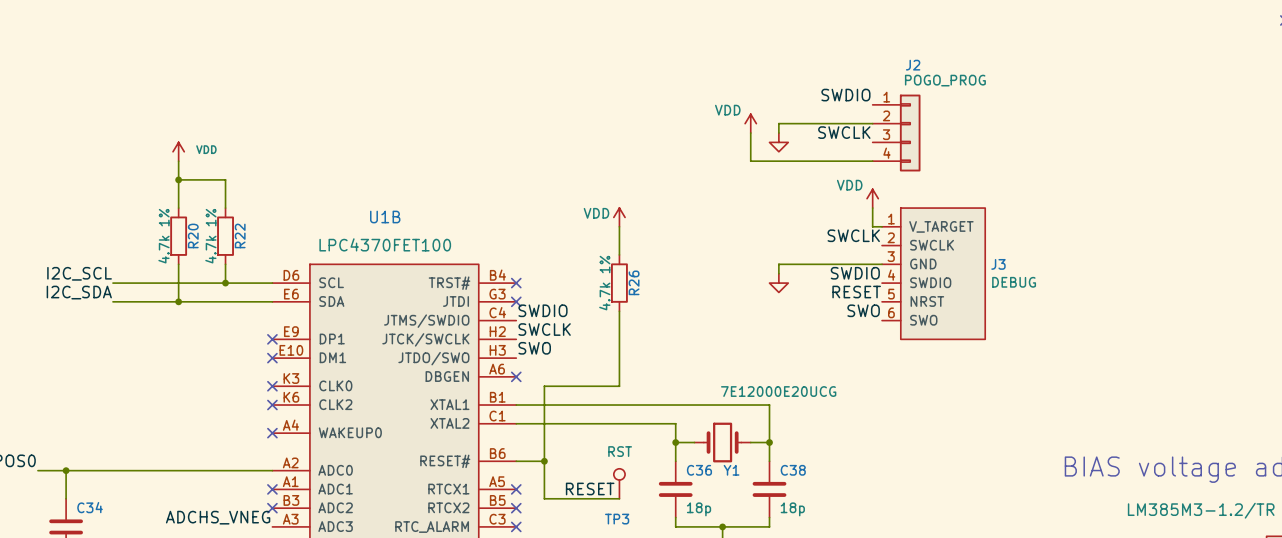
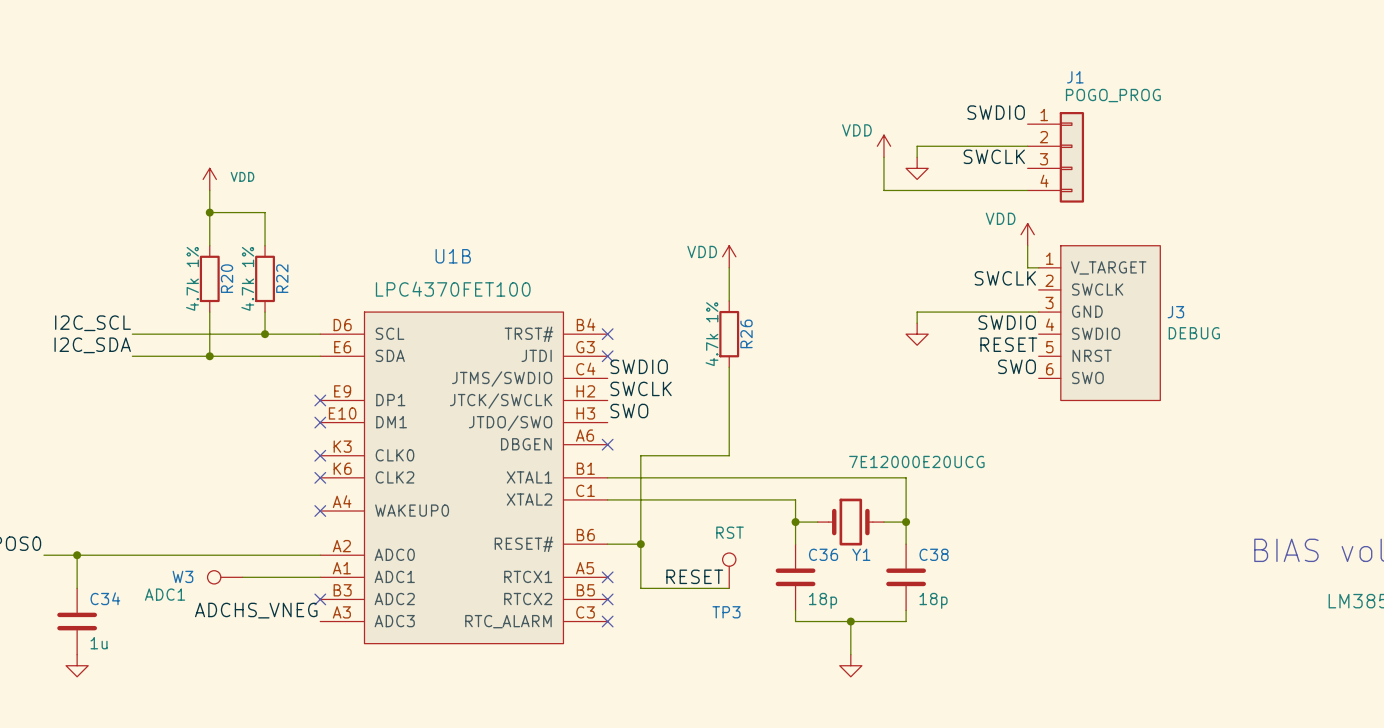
J2 name: J2 (913, 65) -> J1 (1075, 77)
W3: none -> ADC1 (225, 577)
wire: none -> (242, 577) (320, 577)
no-connect mark: (272, 489) -> none

